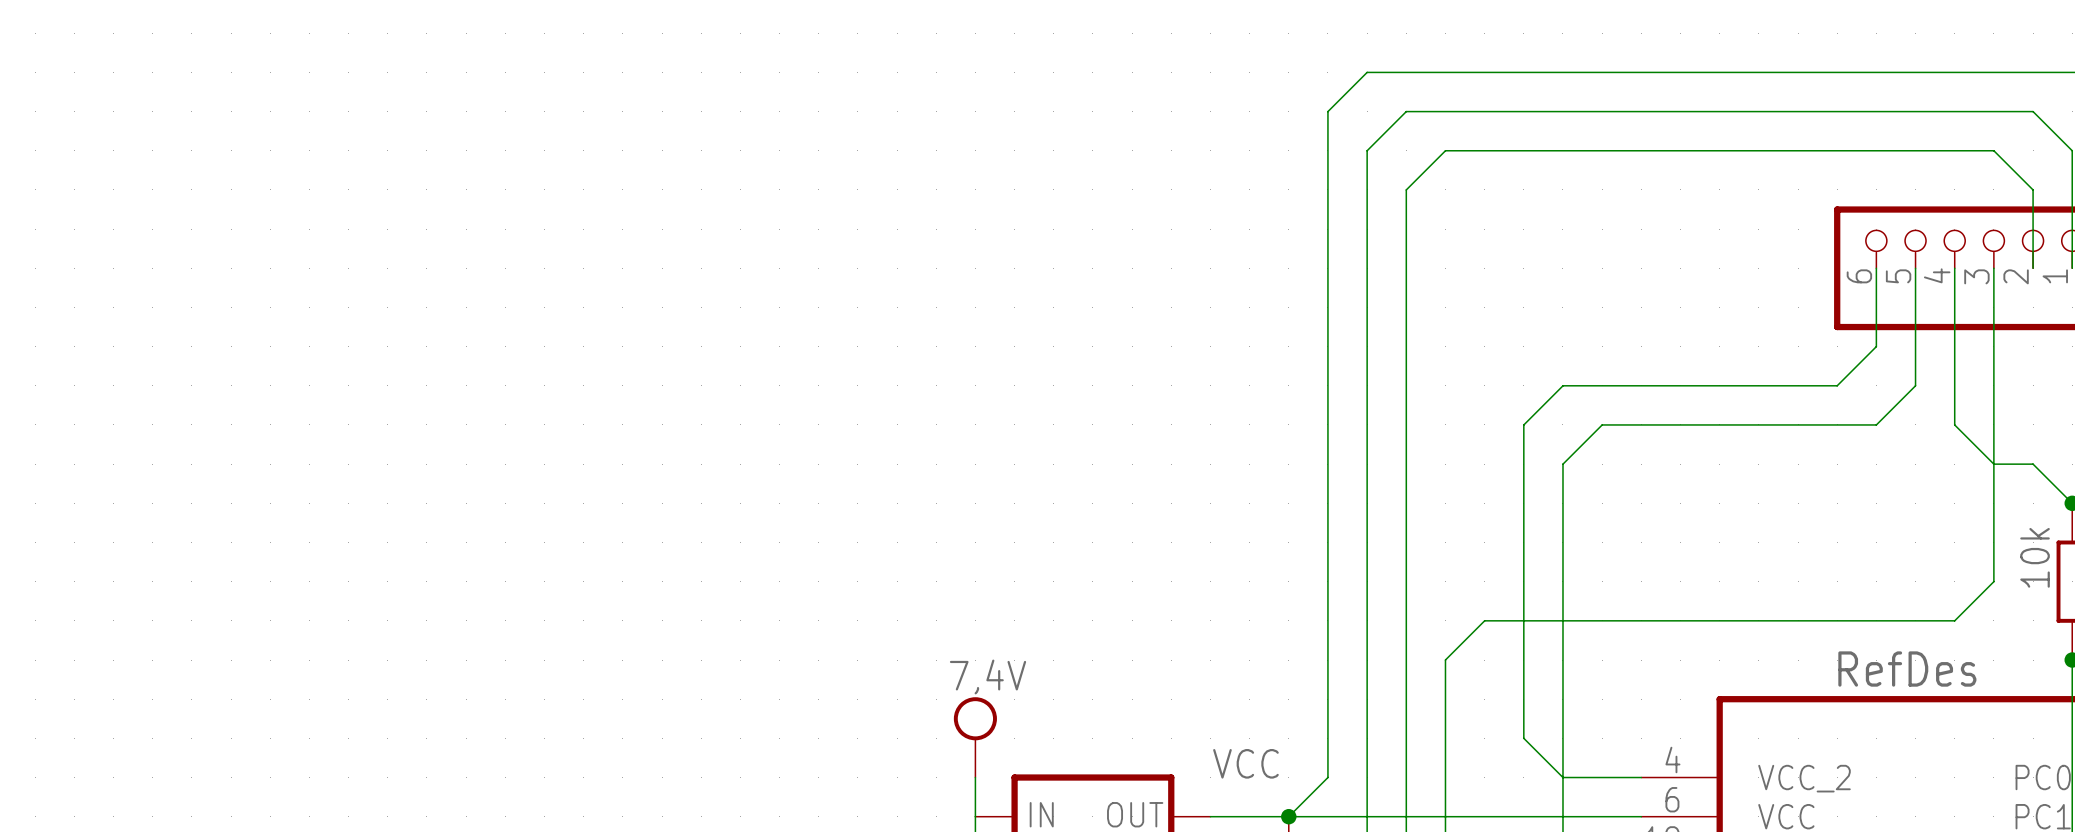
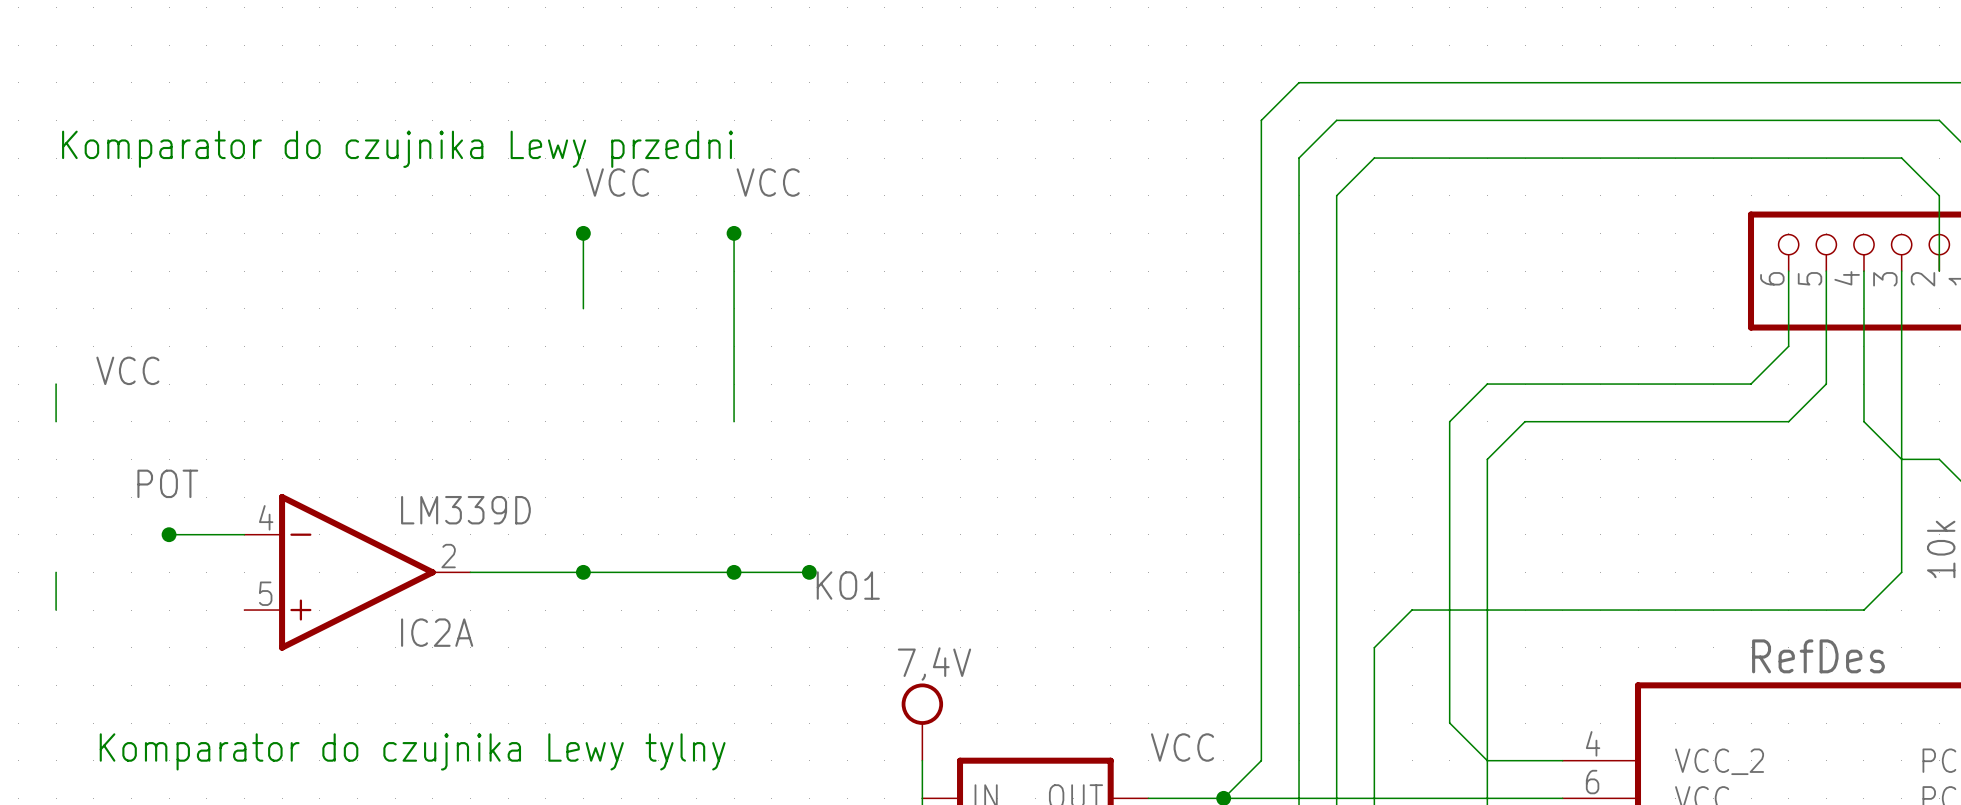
text: none -> Komparator do czujnika Lewy przedni (397, 149)
label: none -> VCC (617, 182)
label: none -> VCC (768, 182)
wire: none -> (583, 233) (583, 308)
junction: none -> (583, 233)
wire: none -> (734, 233) (734, 421)
junction: none -> (734, 233)
label: none -> VCC (127, 370)
wire: none -> (56, 384) (56, 421)
label: none -> POT (167, 483)
wire: none -> (169, 534) (244, 534)
junction: none -> (169, 534)
wire: none -> (56, 572) (56, 610)
IC2A: none -> LM339D (357, 572)
wire: none -> (470, 572) (809, 572)
junction: none -> (583, 572)
junction: none -> (734, 572)
junction: none -> (809, 572)
label: none -> KO1 (848, 585)
text: none -> Komparator do czujnika Lewy tylny (412, 751)

